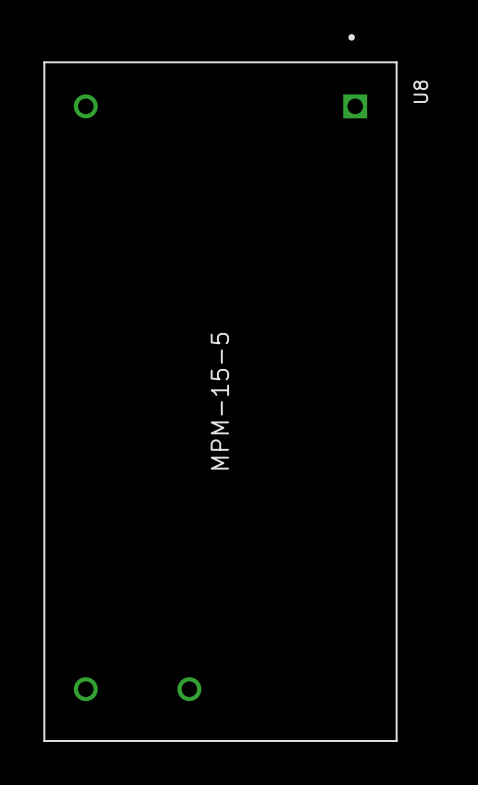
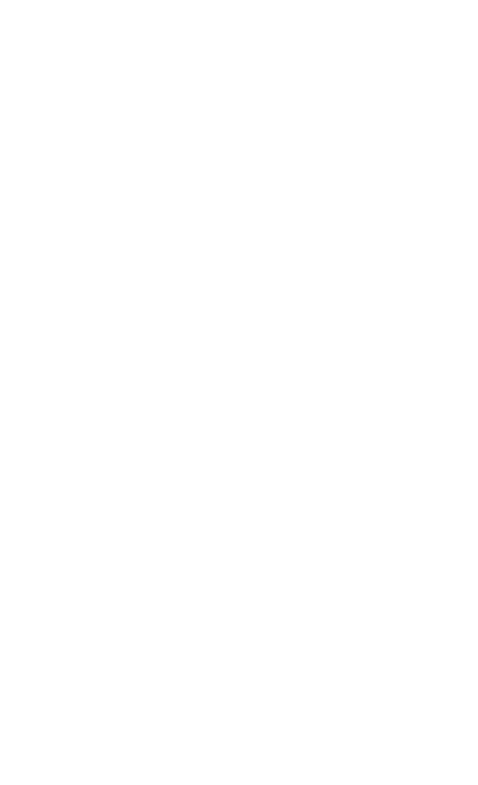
U8: MPM-15-5 (220, 388) -> none

